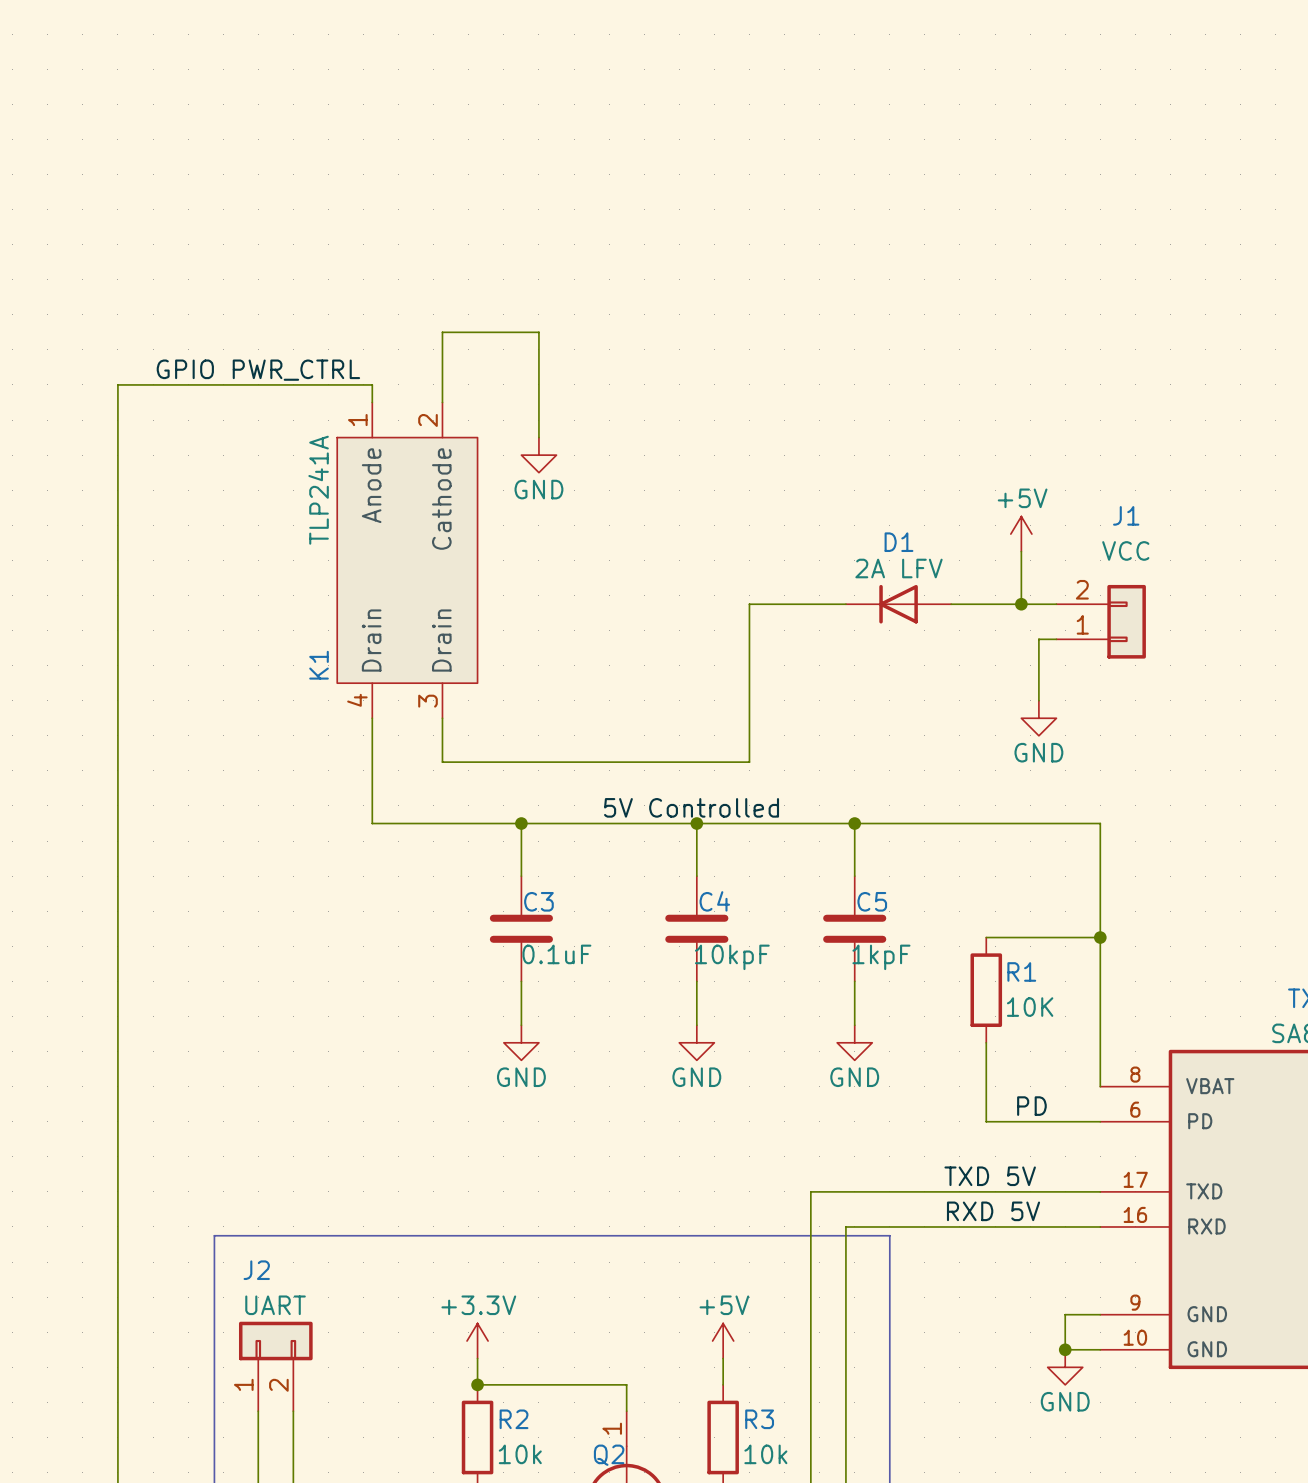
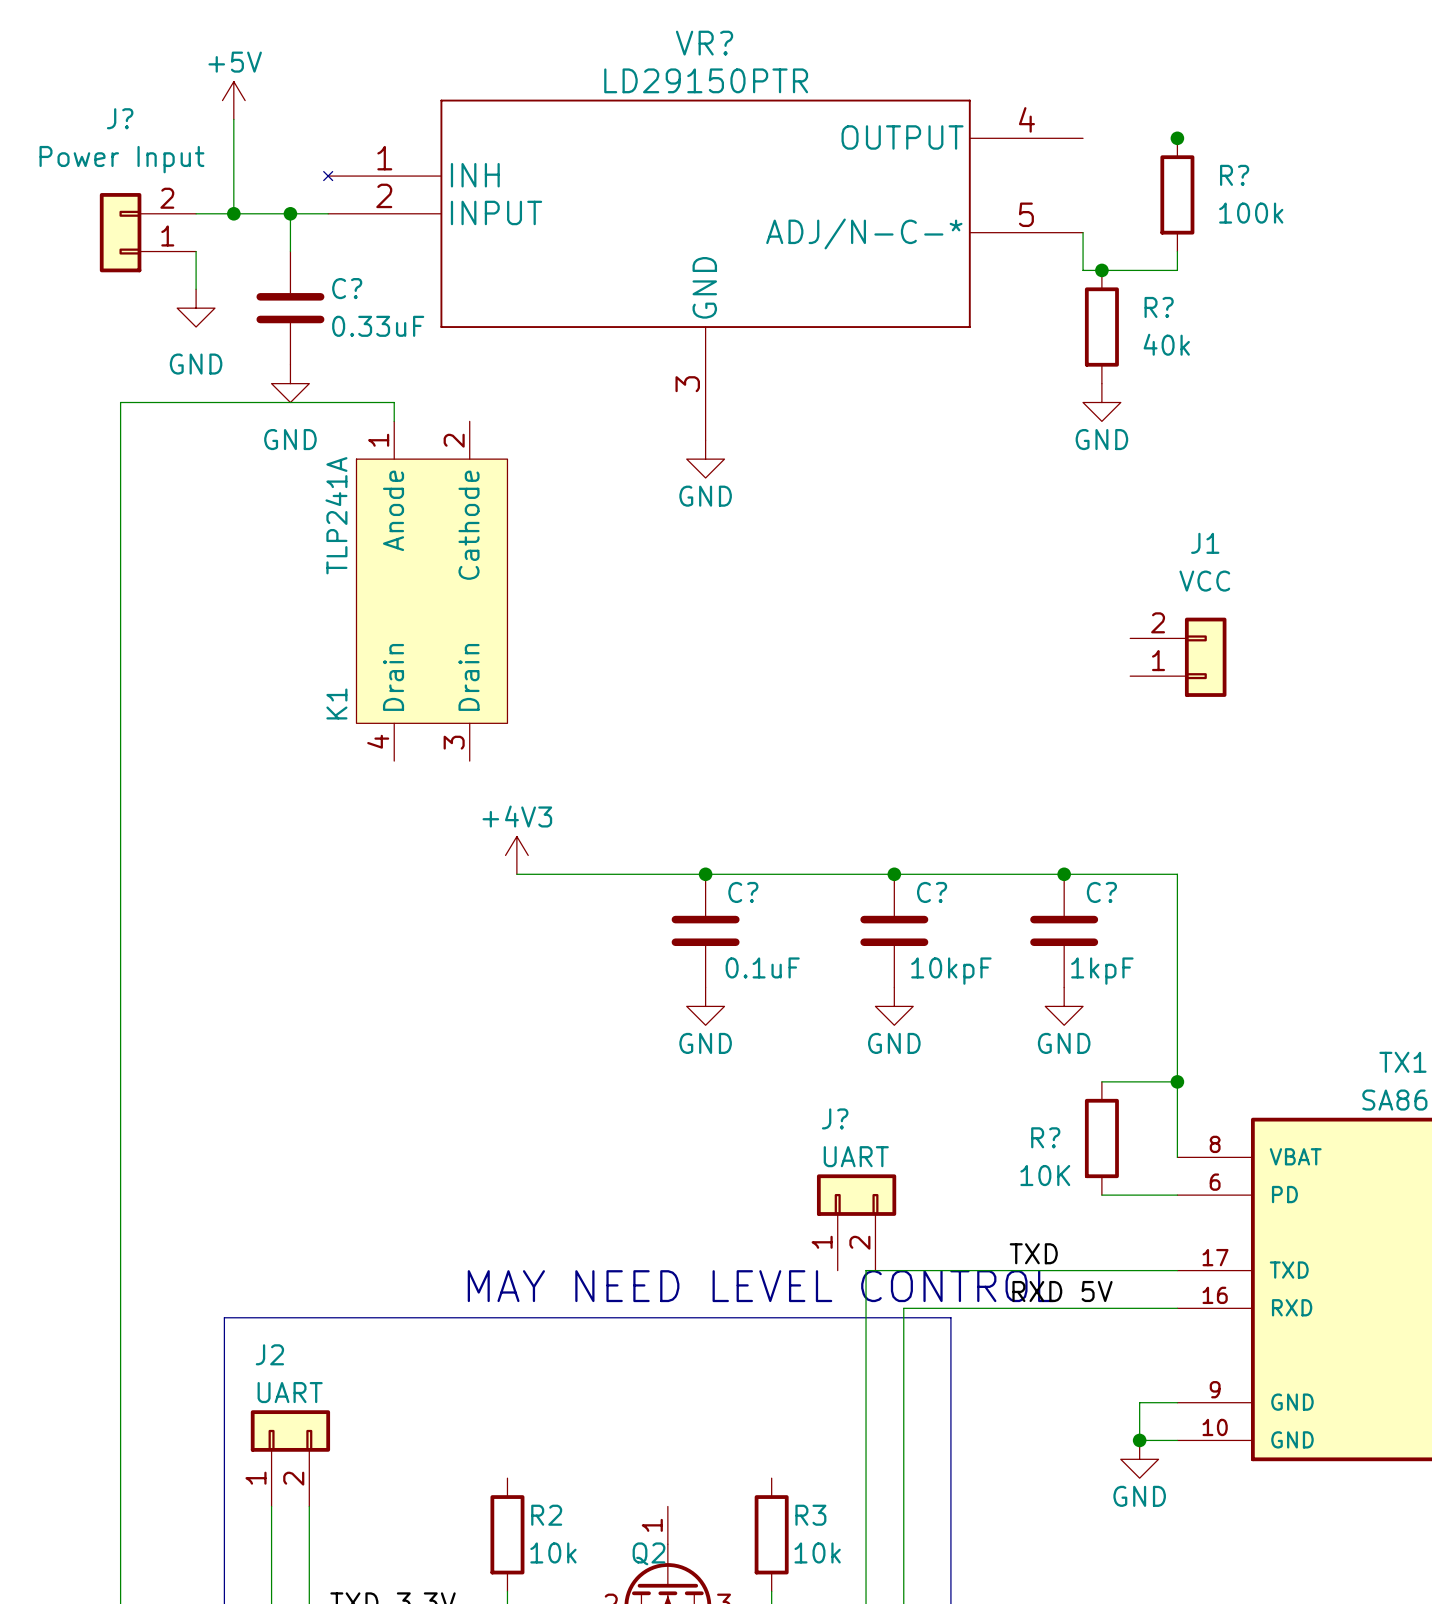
power symbol: none -> +5V (233, 100)
wire: none -> (233, 119) (233, 213)
junction: none -> (1177, 138)
R?: none -> 100k (1177, 194)
wire: none -> (196, 213) (328, 213)
junction: none -> (233, 213)
wire: none -> (290, 213) (290, 251)
junction: none -> (290, 213)
J?: none -> Power Input (147, 232)
wire: none -> (1083, 232) (1083, 270) (1177, 270) (1177, 251)
wire: none -> (196, 251) (196, 289)
VR?: none -> LD29150PTR (703, 269)
junction: none -> (1101, 270)
power symbol: none -> GND (196, 308)
C?: none -> 0.33uF (290, 308)
R?: none -> 40k (1101, 327)
power symbol: none -> GND (290, 383)
label: GPIO PWR_CTRL (258, 370) -> none
power symbol: none -> GND (1101, 402)
wire: (442, 402) (442, 332) (538, 332) (538, 437) -> none
power symbol position: GND (538, 455) -> GND (705, 459)
power symbol: +5V (1021, 534) -> none
wire: (1021, 551) (1021, 604) -> none
wire: (845, 604) (749, 604) (749, 762) (442, 762) (442, 718) -> none
D1: 2A LFV (898, 604) -> none
wire: (951, 604) (1056, 604) -> none
junction: (1021, 604) -> none
wire: (1056, 639) (1038, 639) (1038, 700) -> none
wire: (372, 718) (372, 823) (486, 823) -> none
power symbol: GND (1038, 718) -> none
power symbol: none -> +4V3 (516, 855)
label: 5V Controlled (691, 807) -> none
wire: (521, 823) (521, 876) -> none
junction: (521, 823) -> none
wire: (696, 823) (696, 876) -> none
junction position: (696, 823) -> (705, 874)
wire: (854, 823) (854, 876) -> none
junction position: (854, 823) -> (894, 874)
junction: none -> (1064, 874)
C?: none -> 0.1uF (705, 930)
C?: none -> 10kpF (894, 930)
C?: none -> 1kpF (1064, 930)
C3: 0.1uF (521, 928) -> none
C4: 10kpF (696, 928) -> none
C5: 1kpF (854, 928) -> none
wire: (986, 937) (1100, 937) -> none
junction: (1100, 937) -> none
power symbol: none -> GND (705, 1006)
power symbol: none -> GND (894, 1006)
power symbol: none -> GND (1064, 1006)
wire: (521, 981) (521, 1025) -> none
wire: (696, 981) (696, 1025) -> none
wire: (854, 981) (854, 1025) -> none
R1: 10K (986, 990) -> none
wire: none -> (1101, 1081) (1177, 1081)
junction: none -> (1177, 1081)
power symbol: GND (521, 1042) -> none
power symbol: GND (696, 1042) -> none
power symbol: GND (854, 1042) -> none
wire: (986, 1042) (986, 1121) (1030, 1121) -> none
R?: none -> 10K (1101, 1138)
label: PD (1031, 1106) -> none
J?: none -> UART (856, 1222)
label: TXD 5V (990, 1176) -> TXD (1033, 1253)
text: none -> MAY NEED LEVEL CONTROL (761, 1286)
power symbol: +3.3V (477, 1341) -> none
power symbol: +5V (723, 1341) -> none
wire: (477, 1358) (477, 1384) (626, 1384) (626, 1411) -> none
wire: (723, 1358) (723, 1384) -> none
junction: (477, 1384) -> none

